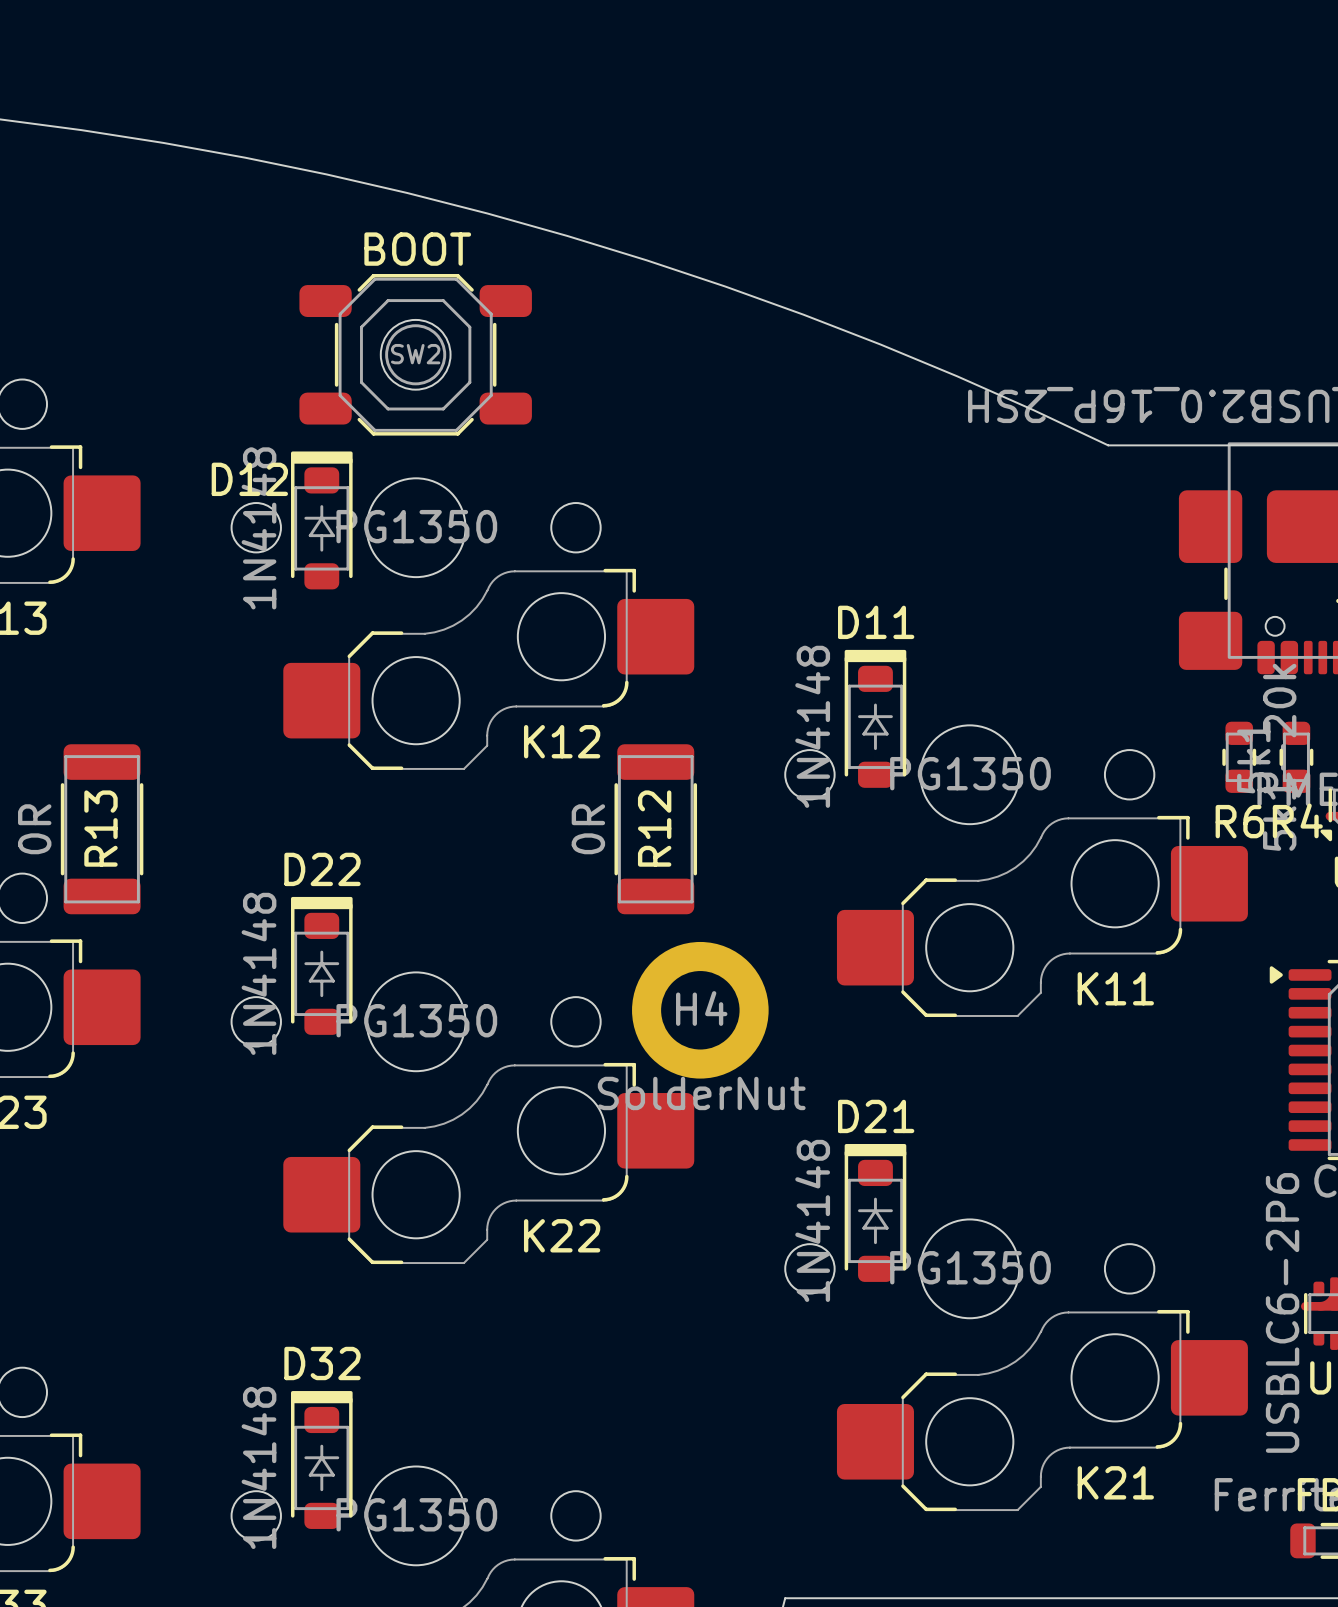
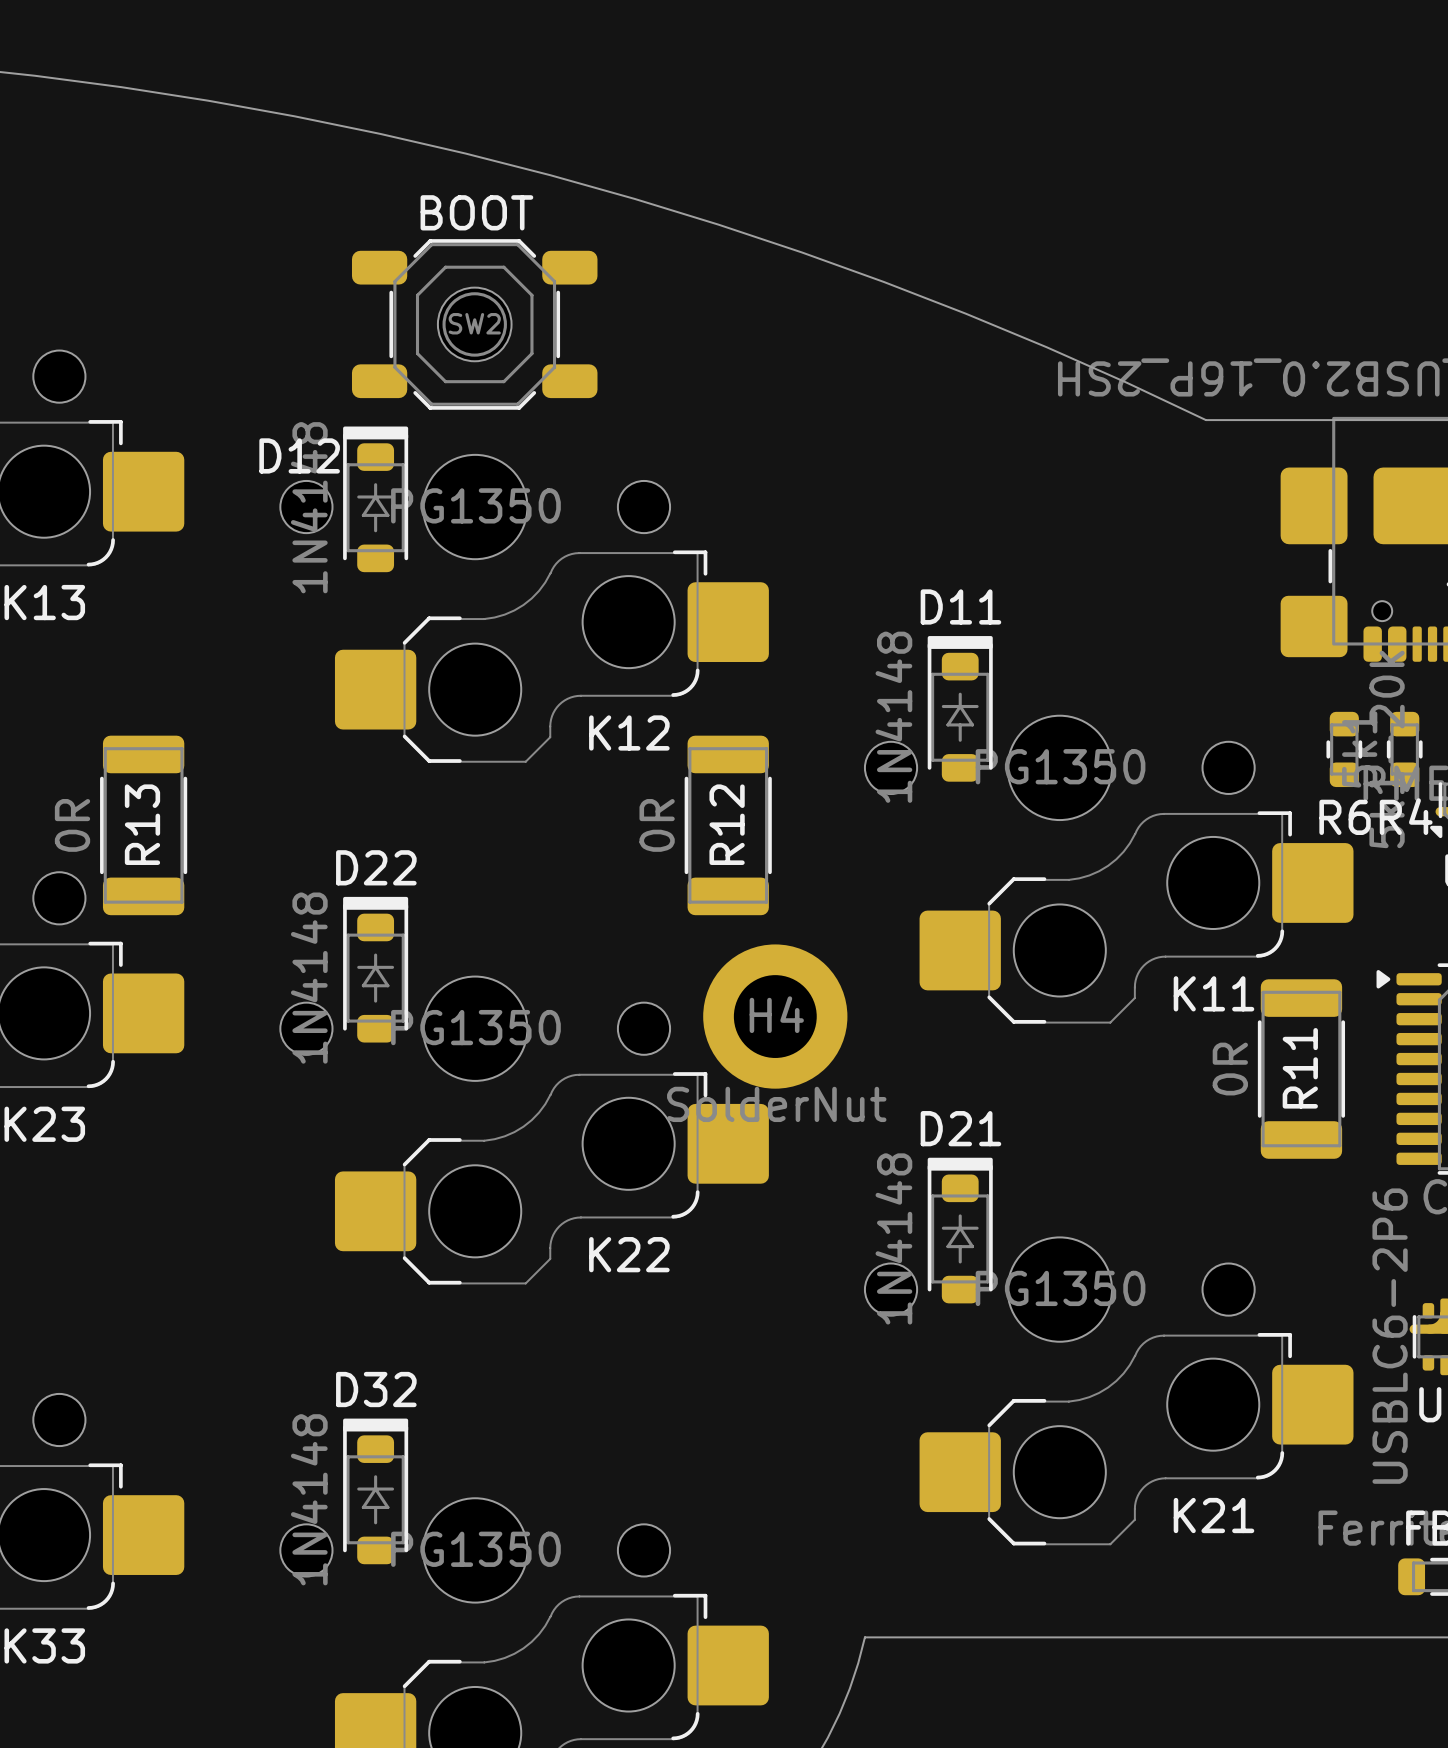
R11: none -> 0R (1301, 1069)

